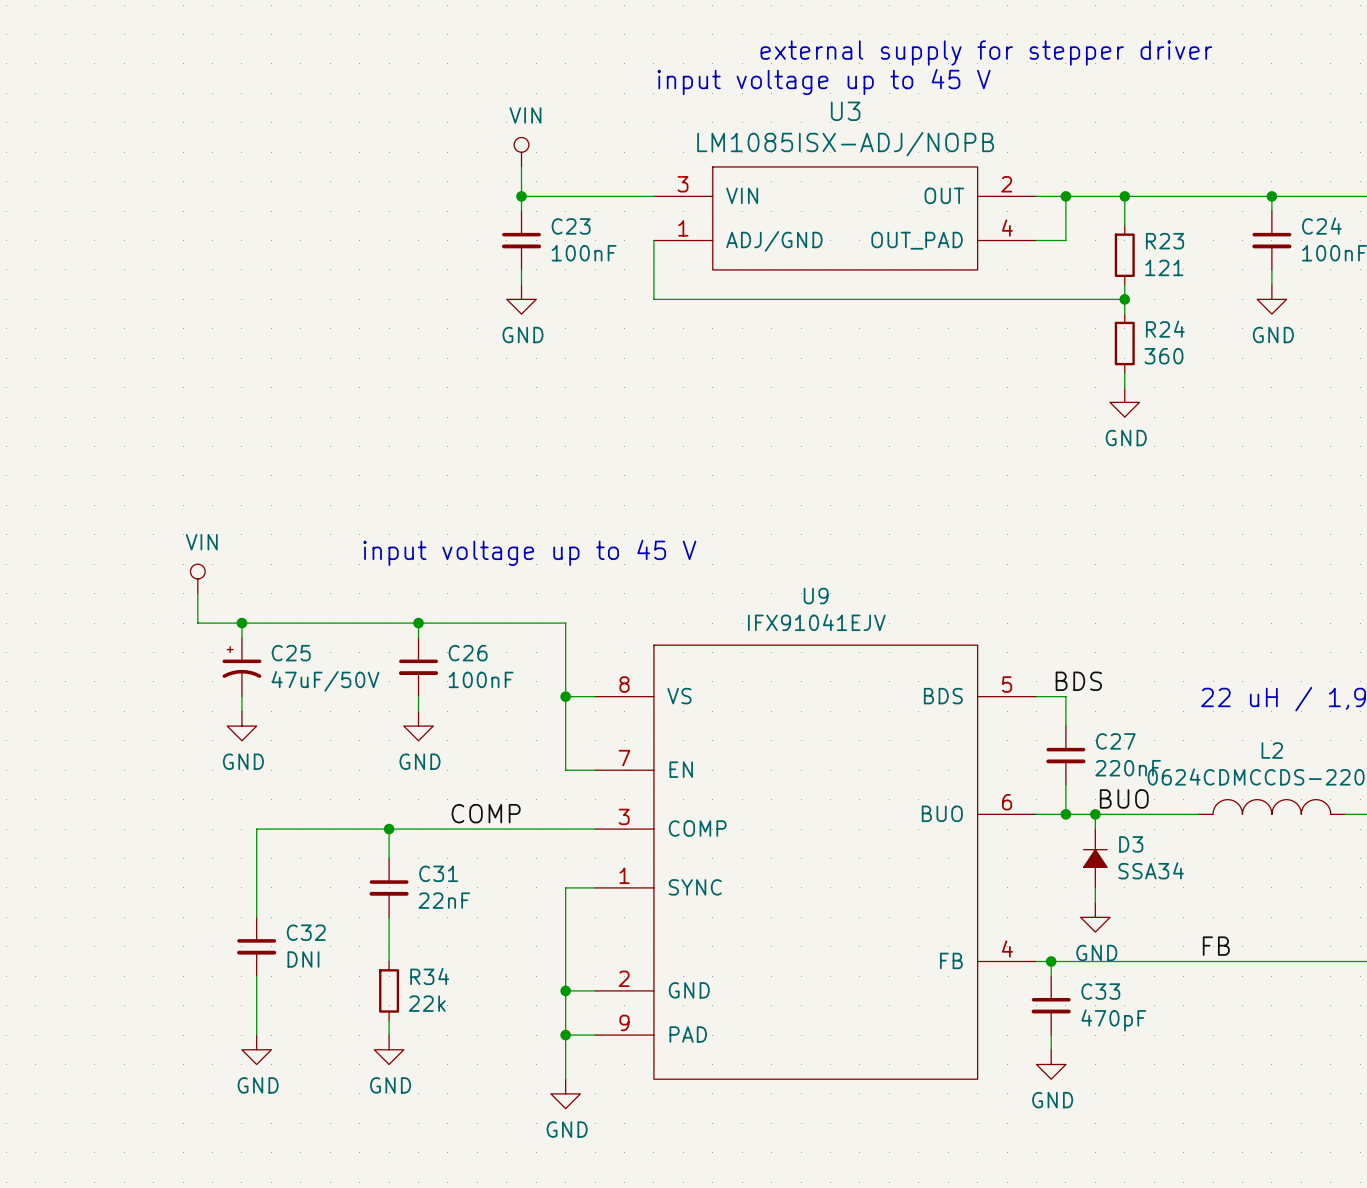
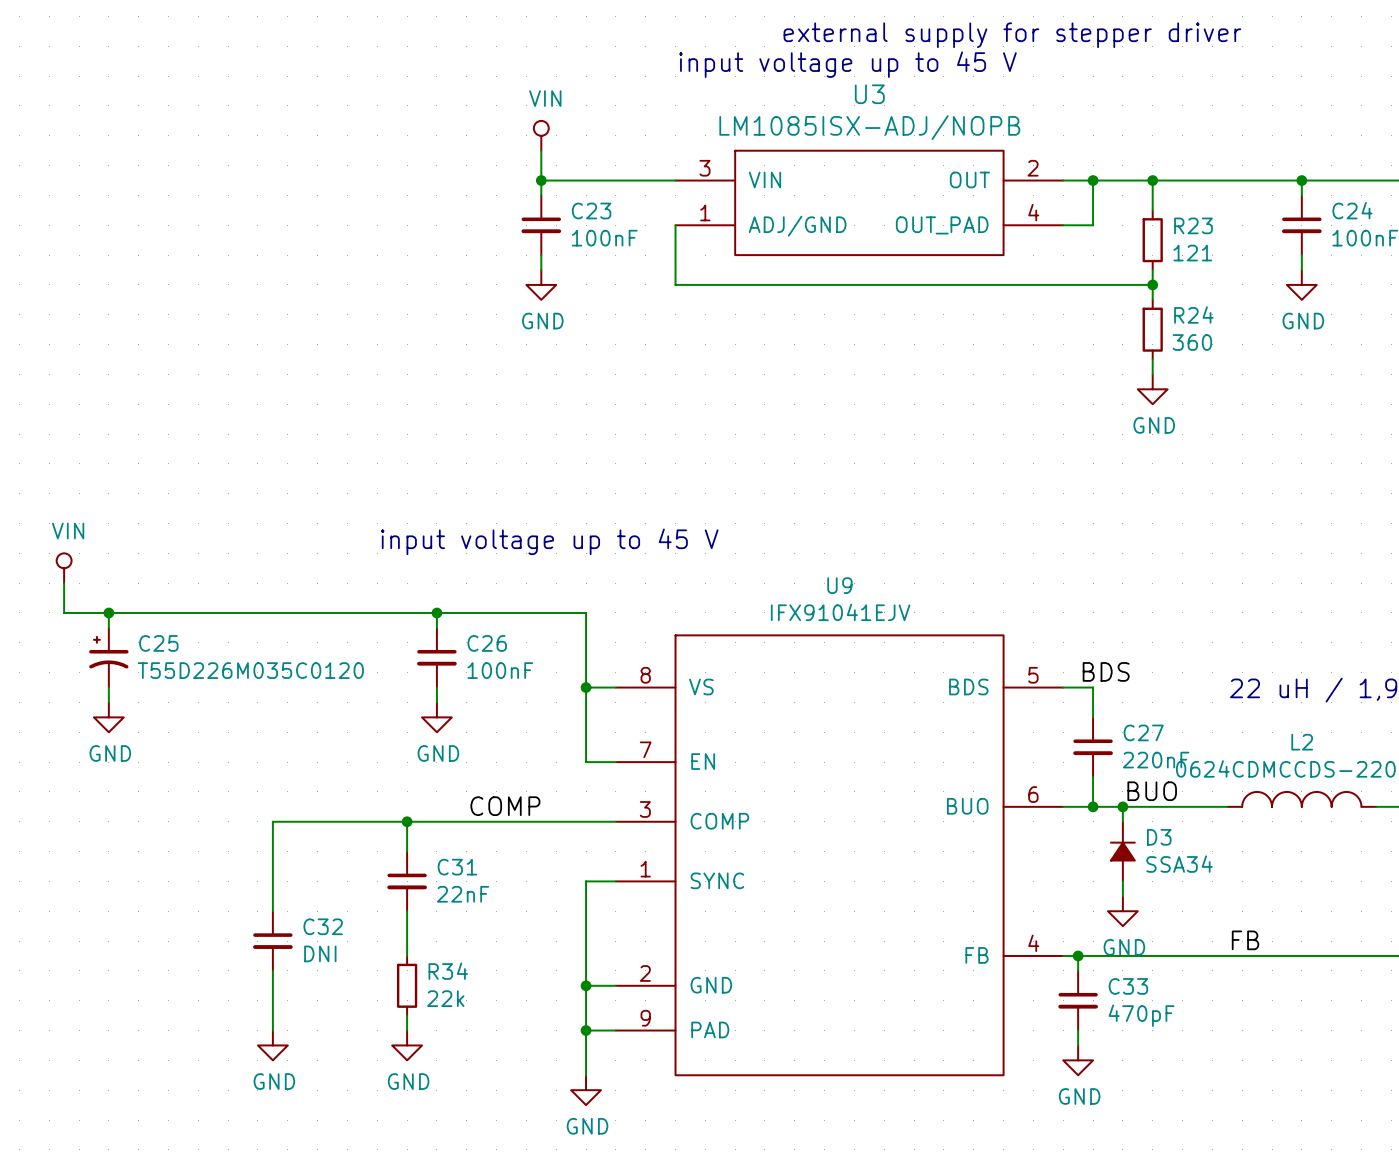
power symbol position: VIN (197, 578) -> VIN (64, 568)
wire: (197, 593) (197, 623) -> (64, 583) (64, 612) (213, 612)
junction: none -> (108, 612)
wire: (241, 623) (241, 637) -> (108, 612) (108, 627)
junction: (241, 623) -> none
C25 position: (241, 667) -> (108, 657)
C25 value: 47uF/50V (325, 681) -> T55D226M035C0120 (250, 670)
wire: (241, 696) (241, 711) -> (108, 687) (108, 702)
power symbol position: GND (241, 726) -> GND (108, 717)

